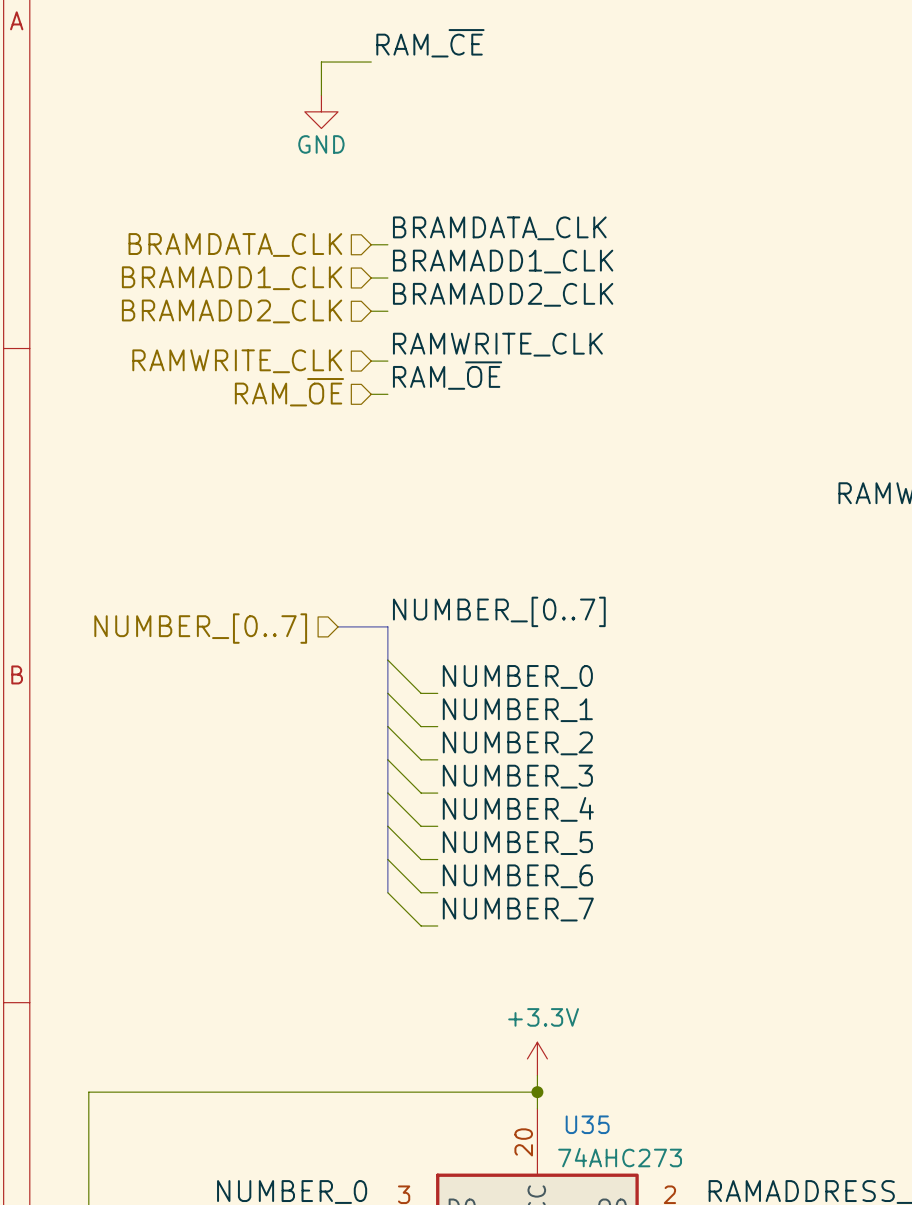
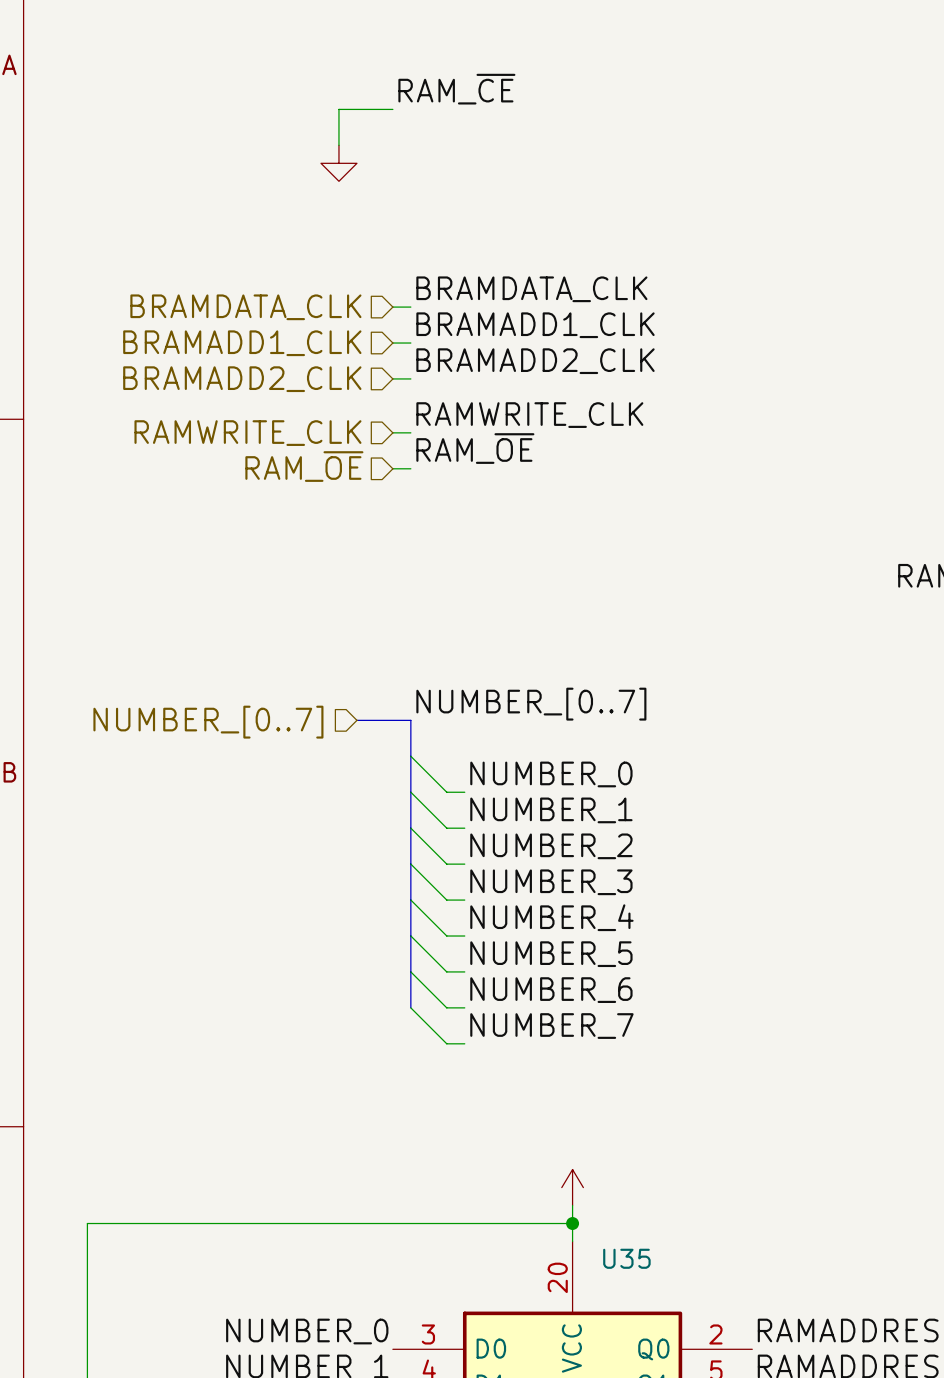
power symbol text: GND (321, 144) -> none
power symbol text: +3.3V (543, 1017) -> none
U35 value: 74AHC273 (620, 1157) -> none

